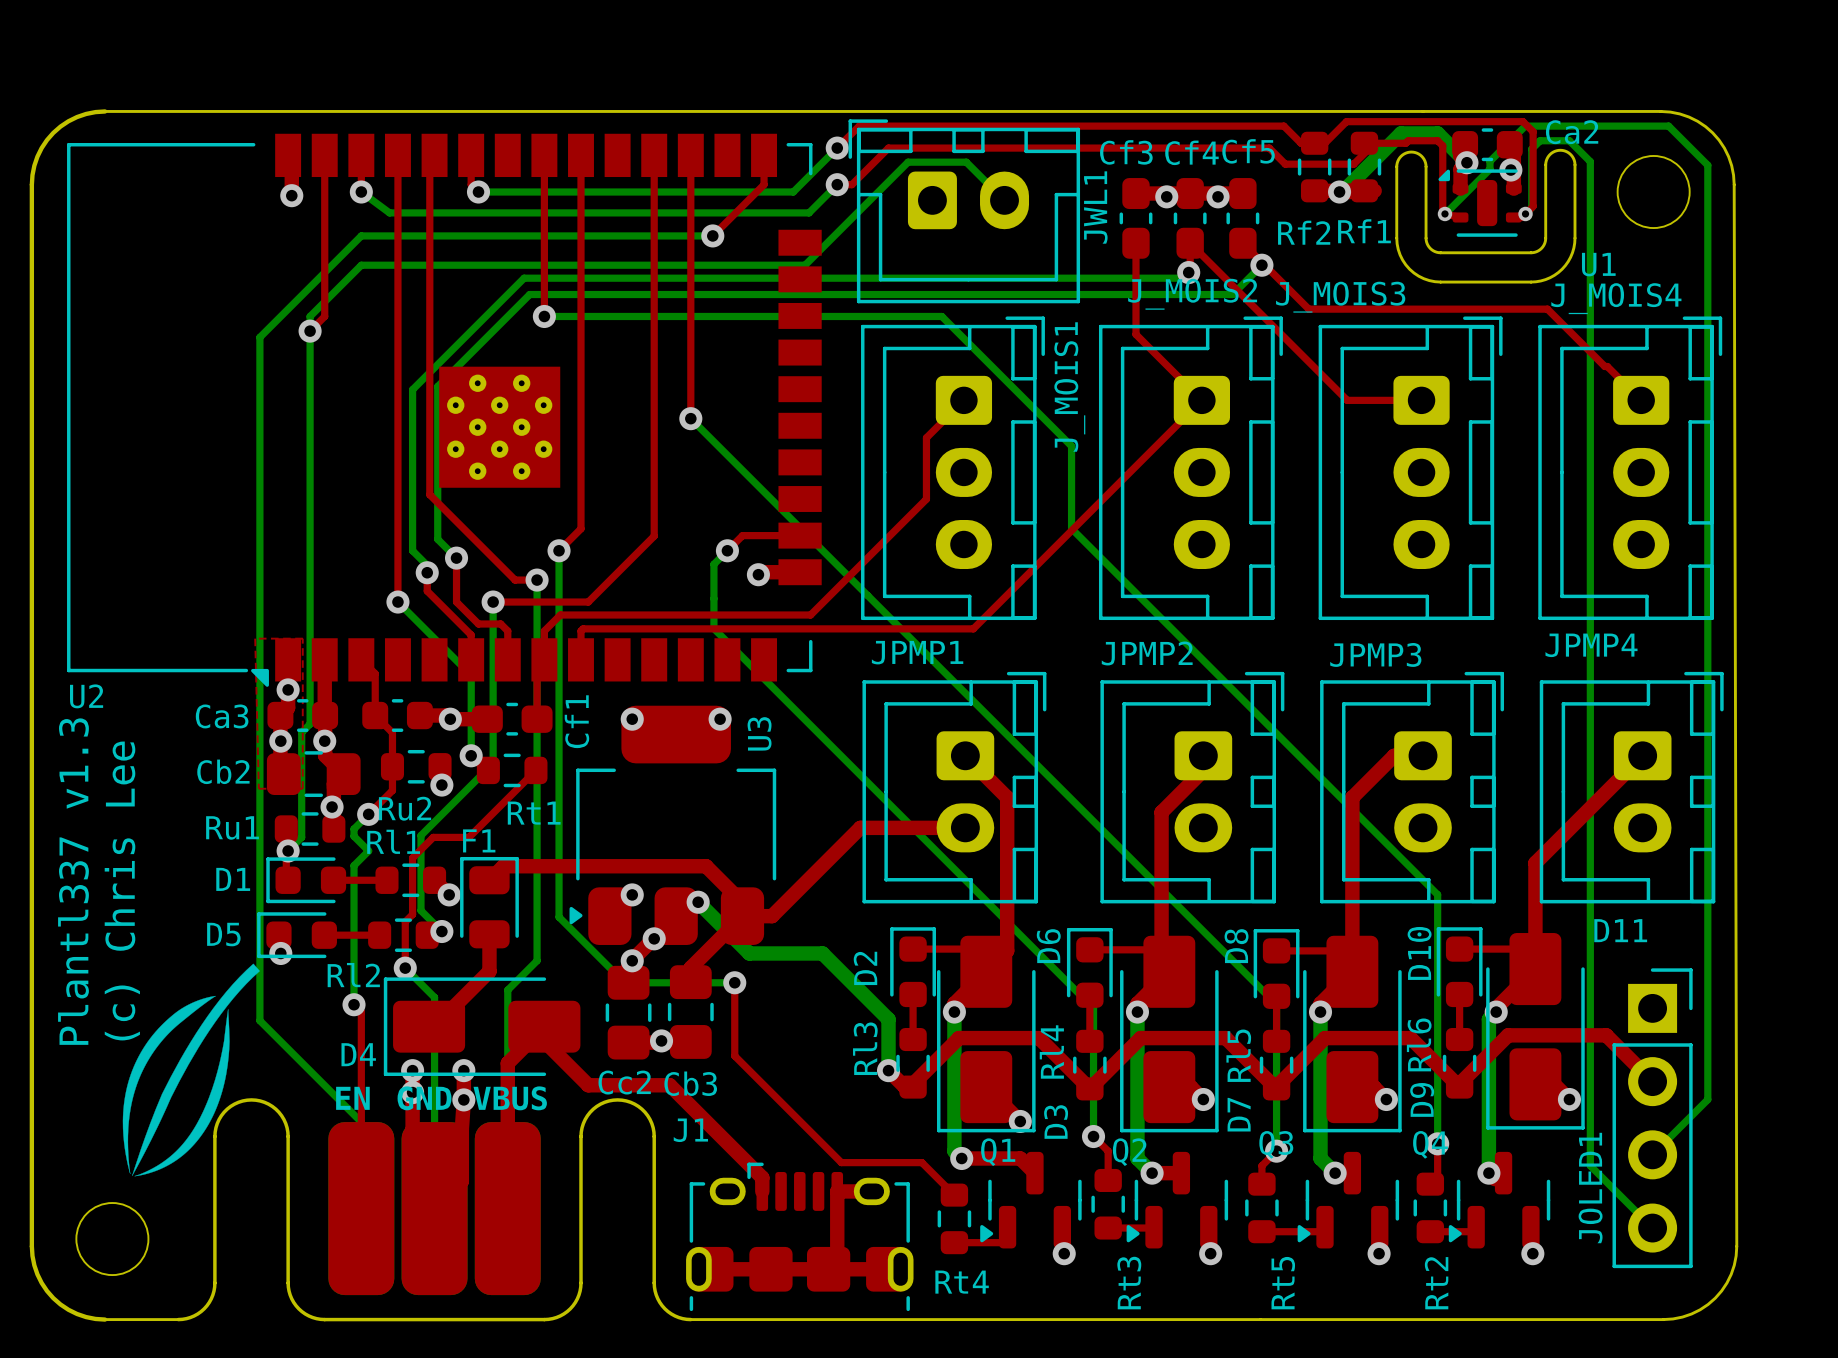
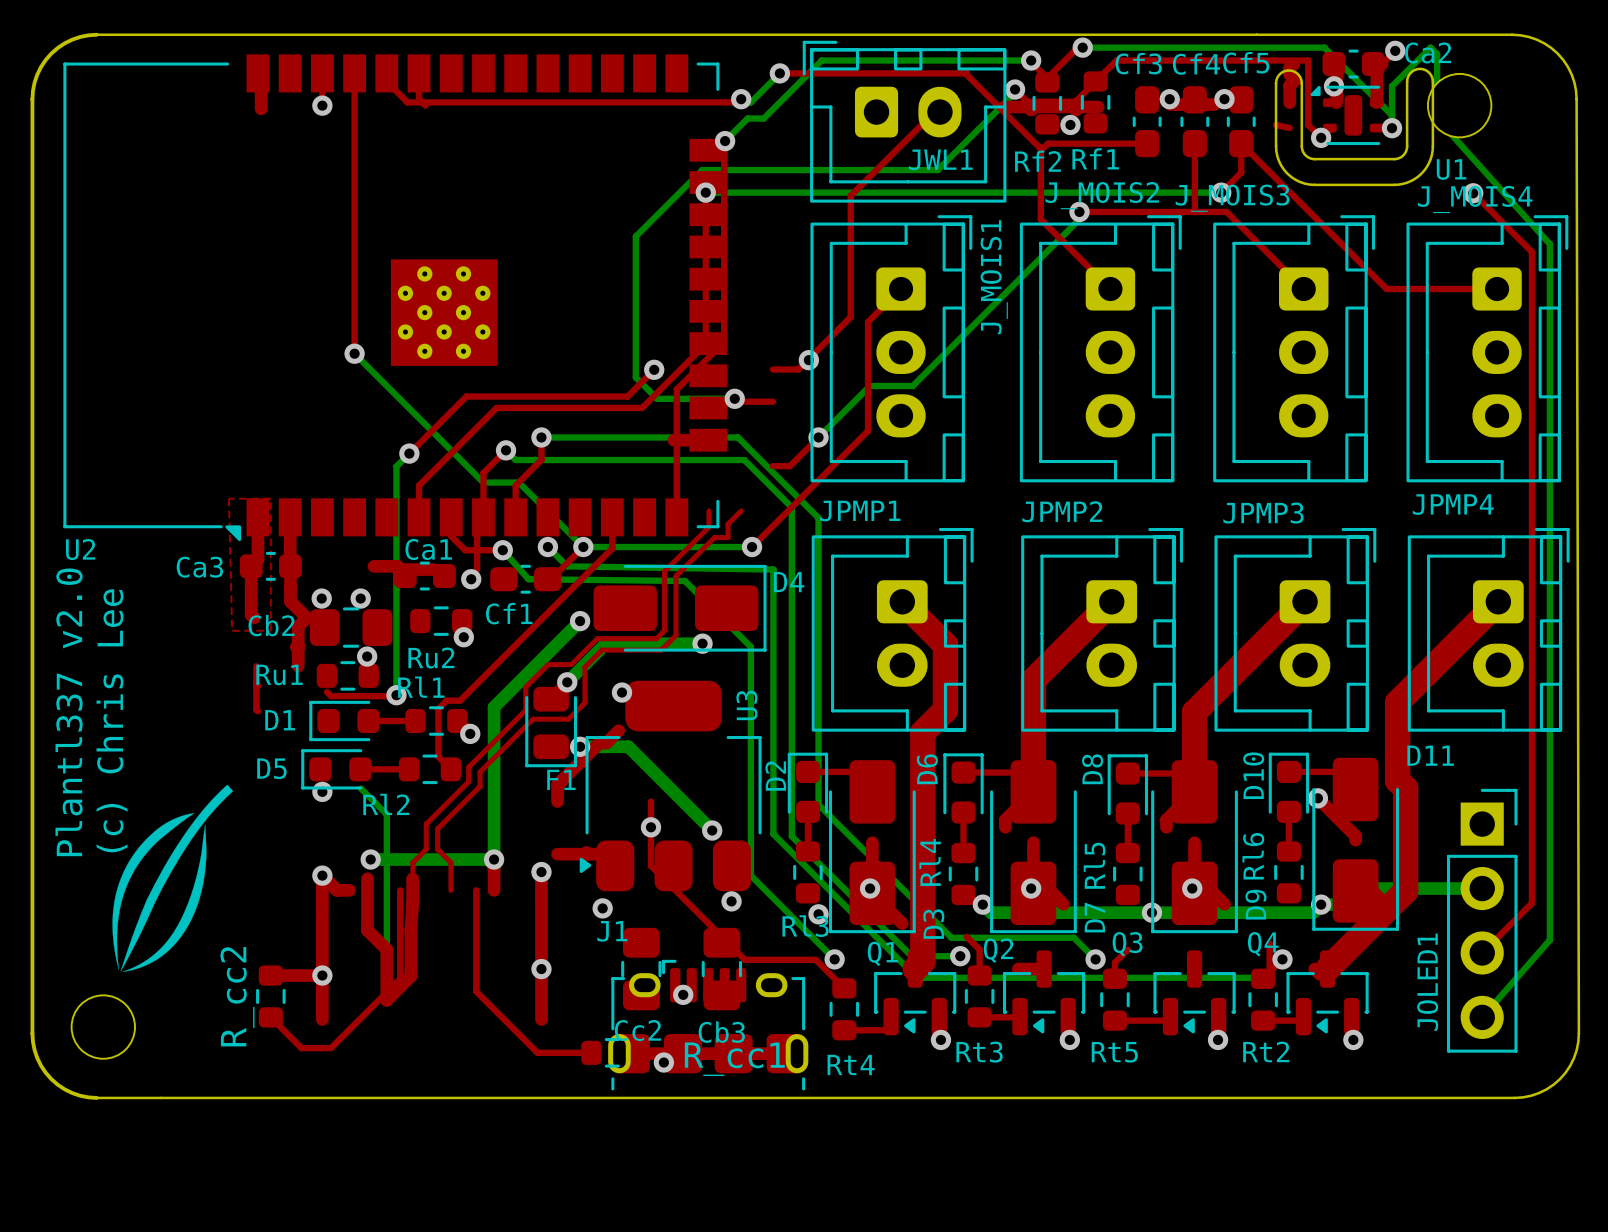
board edge: (1660, 111) (1688, 117) (1712, 132) (1728, 156) (1733, 175) (1736, 1246) (1731, 1274) (1715, 1298) (1691, 1314) (1663, 1319) -> (1466, 34) (1520, 35) (1544, 43) (1557, 53) (1567, 66) (1576, 90) (1578, 1033) (1576, 1050) (1570, 1065) (1560, 1079) (1546, 1089) (1522, 1097) (1468, 1097)
top track: (1219, 126) (859, 126) (837, 148) -> (1077, 47) (1047, 78) (1031, 60)
top track: (1225, 126) (1283, 126) (1301, 143) (1324, 143) (1346, 121) (1523, 121) (1533, 131) (1533, 206) (1522, 217) (1513, 217) -> none
bottom track: none -> (1082, 47) (1324, 47) (1392, 115)
via: none -> (1082, 47)
top track: none -> (1395, 50) (1382, 64) (1373, 64) (1376, 67) (1376, 102)
via: none -> (1395, 50)
bottom track: none -> (1031, 60) (821, 60) (763, 118) (747, 118) (725, 141)
via: none -> (1031, 60)
top track: (1408, 140) (1405, 143) (1374, 143) (1353, 164) (1285, 164) (1269, 148) (888, 148) (851, 184) (837, 184) -> (1243, 60) (1116, 60) (1075, 101) (1027, 101) (1015, 89)
top track: (1437, 140) (1442, 145) (1442, 211) -> (1269, 60) (1308, 60) (1308, 124) (1321, 137) (1329, 128) (1329, 130)
Ca2 position: (1487, 144) -> (1353, 64)
top track: none -> (386, 66) (386, 81) (407, 102) (731, 102)
bottom track: (837, 148) (793, 192) (478, 192) -> none
via: (837, 148) -> none
top track: (324, 155) (324, 316) (310, 331) -> none
top track: (434, 155) (429, 160) (429, 494) (515, 580) (537, 580) -> none
top track: (544, 155) (544, 316) -> none
top track: (581, 155) (581, 528) (559, 550) -> none
top track: (654, 155) (654, 536) (588, 602) (493, 602) -> none
top track: (690, 155) (690, 418) -> none
top track: (764, 155) (764, 184) (712, 235) -> none
top track: none -> (779, 73) (966, 73) (1040, 147) (1040, 219) (1110, 289)
bottom track: none -> (779, 73) (750, 102) (731, 102)
via: none -> (779, 73)
bottom track: (1466, 162) (1437, 133) (1401, 133) (1342, 192) (1339, 192) -> none
via: (1466, 162) -> none
Rf2 position: (1314, 167) -> (1047, 103)
Rf1 position: (1364, 167) -> (1095, 102)
via: none -> (1015, 89)
bottom track: (837, 184) (809, 212) (389, 212) (361, 192) -> none
via: none -> (1224, 99)
via: (478, 192) -> none
via position: (1339, 192) -> (1169, 99)
via: (291, 195) -> none
via: (1166, 196) -> none
via position: (1218, 196) -> (1070, 124)
top track: none -> (939, 112) (934, 112) (850, 195) (850, 317) (798, 369) (772, 369)
bottom track: (1004, 200) (966, 162) (908, 162) (805, 265) -> (1015, 89) (1015, 92) (937, 170) (712, 170)
U1 position: (1480, 203) -> (1347, 115)
JWL1 name rotation: 0° (1095, 207) -> 90° clockwise (940, 159)
JWL1 position: (964, 211) -> (904, 121)
via: (1444, 213) -> none
bottom track: (1445, 213) (1489, 169) (1489, 161) (1525, 126) (1668, 126) (1707, 165) (1707, 1099) (1652, 1154) -> none
bottom track: (1525, 213) (1531, 207) (1531, 149) (1540, 140) (1569, 140) (1590, 161) (1590, 1165) (1652, 1228) -> none
via: (1525, 213) -> none
bottom track: none -> (1392, 128) (1392, 86) (1430, 47) (1437, 54) (1437, 118) (1549, 244) (1549, 940) (1482, 1017)
via: none -> (1392, 128)
Cf3 position: (1135, 218) -> (1147, 121)
Cf4 position: (1190, 218) -> (1194, 121)
Cf5 position: (1242, 218) -> (1241, 121)
via: none -> (1321, 137)
top track: none -> (725, 141) (724, 342) (676, 389) (676, 510)
via: none -> (725, 141)
bottom track: (712, 235) (361, 235) (259, 337) (259, 1020) (361, 1122) (361, 1208) -> none
via: (712, 235) -> none
top track: none -> (1147, 143) (1047, 143) (1040, 150)
top track: none -> (1194, 143) (1195, 211)
top track: (1135, 243) (1135, 334) (1201, 400) (973, 628) (583, 628) (581, 631) -> (541, 437) (541, 459) (515, 485) (515, 491)
top track: (1242, 243) (1261, 262) (1261, 265) (1264, 265) (1308, 309) (1547, 309) (1641, 400) -> none
board edge: (1488, 252) (1438, 252) (1430, 248) (1426, 238) (1425, 162) (1421, 156) (1415, 152) (1407, 152) (1401, 156) (1396, 166) (1396, 238) (1398, 249) (1405, 264) (1418, 276) (1429, 280) (1488, 282) -> (1314, 159) (1306, 156) (1301, 147) (1300, 78) (1294, 71) (1284, 71) (1279, 74) (1276, 81) (1277, 156) (1284, 169) (1291, 176) (1299, 181) (1314, 184)
board edge: (1531, 252) (1540, 249) (1545, 239) (1546, 159) (1555, 151) (1565, 151) (1571, 155) (1574, 163) (1573, 247) (1568, 261) (1558, 272) (1545, 279) (1531, 282) -> (1351, 159) (1395, 159) (1403, 155) (1407, 146) (1407, 78) (1410, 72) (1416, 69) (1423, 69) (1429, 72) (1432, 81) (1432, 146) (1426, 166) (1414, 178) (1402, 183) (1351, 184)
bottom track: (793, 265) (361, 265) (310, 316) (310, 724) (301, 732) (301, 837) (288, 850) -> (702, 170) (635, 236) (635, 377) (657, 398) (734, 398)
bottom track: (1261, 265) (1232, 294) (529, 294) (437, 386) (437, 539) (456, 558) -> none
via: (1261, 265) -> none
top track: (1188, 272) (1190, 243) (1347, 400) (1421, 400) -> none
bottom track: (1188, 272) (1183, 278) (524, 278) (412, 389) (412, 550) (427, 565) (427, 572) -> none
via: (1188, 272) -> none
bottom track: none -> (705, 192) (1221, 192)
via: none -> (705, 192)
top track: none -> (1221, 192) (1241, 172) (1241, 143) (1386, 289) (1497, 289)
via: none -> (1221, 192)
top track: none -> (1473, 193) (1531, 252) (1531, 903) (1482, 952)
via: none -> (1473, 193)
top track: none -> (1079, 211) (1226, 211) (1303, 289)
bottom track: none -> (1079, 211) (1079, 219) (912, 386) (869, 386) (818, 437)
via: none -> (1079, 211)
bottom track: (544, 316) (941, 316) (1071, 446) (1071, 528) (1437, 894) (1437, 1143) -> none
via: (544, 316) -> none
via: (310, 331) -> none
top track: (963, 400) (926, 437) (926, 499) (810, 615) (560, 615) (544, 631) -> (506, 450) (483, 472) (483, 491)
top track: none -> (901, 289) (868, 321) (868, 431) (752, 547)
bottom track: (690, 418) (1276, 1004) (1276, 1151) -> none
via: (690, 418) -> none
J_MOIS1 position: (952, 468) -> (891, 348)
J_MOIS2 position: (1190, 468) -> (1100, 348)
J_MOIS3 position: (1410, 468) -> (1294, 348)
J_MOIS4 position: (1630, 468) -> (1487, 348)
top track: (397, 473) (397, 602) -> none
bottom track: none -> (354, 353) (483, 482) (518, 482) (583, 547) (752, 547)
via: none -> (354, 353)
via: none -> (808, 360)
top track: none -> (654, 369) (627, 396) (466, 396) (409, 453)
via: none -> (654, 369)
top track: none -> (734, 398) (737, 401) (772, 401)
via: none -> (734, 398)
top track: (800, 535) (742, 535) (727, 550) -> none
bottom track: (559, 550) (559, 917) (624, 982) (734, 982) -> none
via: (559, 550) -> none
bottom track: (727, 550) (713, 564) (713, 628) (1093, 1008) (1093, 1136) -> none
via: (727, 550) -> none
top track: (456, 558) (456, 602) (478, 624) (500, 624) (507, 631) (507, 652) -> none
via: (456, 558) -> none
bottom track: none -> (541, 437) (738, 437) (818, 517) (818, 804) (951, 937) (1073, 937) (1095, 959)
via: none -> (541, 437)
top track: none -> (818, 437) (789, 466) (772, 466)
via: none -> (818, 437)
top track: (427, 572) (427, 591) (471, 635) -> (705, 189) (705, 344) (642, 407) (496, 407) (419, 485) (419, 495)
via: (427, 572) -> none
via: (758, 574) -> none
bottom track: (537, 580) (537, 960) (507, 990) (507, 1208) -> none
via: (537, 580) -> none
bottom track: none -> (506, 450) (515, 460) (744, 460) (791, 507) (791, 836) (911, 956) (960, 956)
via: none -> (506, 450)
bottom track: none -> (409, 453) (396, 466) (396, 695)
via: none -> (409, 453)
bottom track: (397, 602) (471, 675) (471, 755) -> none
via: (397, 602) -> none
bottom track: (493, 602) (493, 763) (420, 835) (420, 910) (441, 931) -> none
via: (493, 602) -> none
top track: none -> (612, 510) (612, 548) (460, 700) (446, 700) (438, 708) (438, 756) (450, 769)
top track: none -> (708, 510) (708, 526) (664, 571) (664, 630) (656, 638) (597, 638) (571, 664) (548, 664) (525, 687) (525, 710) (468, 767) (468, 781) (426, 824) (426, 849) (412, 862) (412, 890)
top track: none -> (741, 510) (728, 524) (728, 537) (714, 537) (675, 576) (675, 635) (661, 650) (602, 650) (584, 667) (584, 702) (568, 719) (532, 719) (480, 772) (480, 786) (437, 828) (437, 849) (450, 862) (450, 890)
top track: (361, 659) (375, 673) (375, 715) (392, 732) (392, 790) (368, 814) -> none
top track: none -> (451, 517) (451, 536) (465, 550) (502, 550)
via: (288, 689) -> none
bottom track: none -> (547, 547) (567, 566) (773, 569) (773, 834) (917, 977) (1264, 977) (1282, 959)
via: none -> (547, 547)
top track: none -> (583, 547) (551, 579) (547, 579)
via: none -> (583, 547)
via: none -> (752, 547)
bottom track: none -> (502, 550) (528, 579) (684, 580) (750, 646) (750, 875) (834, 959)
via: none -> (502, 550)
part: (397, 715) -> none
via: (450, 719) -> none
Cf1 position: (512, 719) -> (525, 579)
via: (632, 719) -> none
via: (720, 719) -> none
Cf1 name rotation: 0° (576, 721) -> 90° clockwise (509, 613)
Ca1: none -> (424, 576)
via: none -> (471, 579)
via: (280, 741) -> none
via: (324, 741) -> none
via: none -> (321, 598)
via: none -> (360, 598)
via: (471, 755) -> none
top track: (965, 755) (1007, 797) (1007, 950) (954, 1003) (954, 1012) -> none
top track: (1203, 755) (1203, 770) (1161, 812) (1161, 964) -> none
top track: none -> (1111, 601) (1033, 680) (1033, 783)
top track: (1423, 755) (1394, 755) (1352, 797) (1352, 881) -> (1305, 601) (1194, 712)
top track: (1642, 755) (1535, 863) (1535, 969) (1492, 1012) (1496, 1012) (1496, 1008) -> none
top track: none -> (1498, 601) (1397, 702) (1397, 780) (1405, 788) (1405, 891) (1327, 969)
Ru2 position: (416, 766) -> (441, 621)
Rt1: (512, 770) -> none
top track: (535, 770) (468, 837) (433, 837) (412, 858) (412, 914) (405, 921) (405, 968) -> none
Cb2 position: (313, 774) -> (351, 627)
bottom track: none -> (580, 621) (494, 707) (494, 870)
via: none -> (580, 621)
via: (441, 785) -> none
JPMP1 position: (954, 787) -> (892, 629)
JPMP2 position: (1192, 787) -> (1102, 629)
JPMP3 position: (1412, 787) -> (1295, 629)
JPMP4 position: (1631, 787) -> (1488, 629)
via: none -> (463, 637)
bottom track: none -> (702, 643) (605, 643) (567, 682)
via: none -> (702, 643)
via: (332, 807) -> none
bottom track: (368, 814) (354, 829) (354, 836) (368, 850) (354, 865) (354, 1004) -> none
via: (368, 814) -> none
via: none -> (367, 656)
U3 position: (672, 825) -> (670, 785)
top track: (965, 827) (860, 827) (772, 916) (742, 916) -> none
Ru1 position: (310, 829) -> (347, 675)
via: none -> (567, 682)
via: (288, 850) -> none
top track: none -> (326, 692) (331, 696) (396, 695)
via: none -> (622, 692)
D1 position: (306, 880) -> (344, 721)
top track: (333, 880) (386, 880) -> (368, 721) (415, 721)
Rl1 position: (410, 880) -> (436, 721)
top track: (489, 880) (503, 866) (706, 866) (742, 902) (742, 916) -> none
text: Plantl337 v1.3 (73, 881) -> Plantl337 v2.0 (69, 712)
top track width: thin (1352, 881) (1352, 961) -> thick (1194, 712) (1194, 783)
via position: (449, 894) -> (396, 695)
via: (632, 894) -> none
F1 rotation: 0° (489, 902) -> 180° (551, 727)
F1 position: (489, 902) -> (551, 727)
bottom track: (698, 902) (749, 953) (822, 953) (888, 1019) (888, 1070) -> none
via: (698, 902) -> none
via: none -> (470, 733)
top track: (742, 916) (690, 967) (690, 982) -> none
bottom track: none -> (580, 746) (628, 746) (712, 830)
via: (441, 931) -> none
top track: (489, 934) (489, 971) (434, 1026) (429, 1026) -> none
D5 position: (297, 935) -> (336, 769)
top track: (324, 935) (379, 935) -> (360, 769) (409, 769)
Rl2 position: (403, 935) -> (429, 769)
via position: (654, 938) -> (580, 746)
via: (280, 953) -> none
via: (632, 960) -> none
via: (405, 968) -> none
D2 name position: D2 (865, 968) -> D2 (775, 776)
via: none -> (322, 791)
top track: none -> (1317, 798) (1355, 836) (1355, 840)
via position: (734, 982) -> (651, 827)
top track: (354, 1004) (361, 1012) (361, 1066) -> (349, 890) (337, 890) (322, 875)
via: (354, 1004) -> none
Cc2 position: (628, 1012) -> (641, 969)
Cb3 position: (690, 1012) -> (721, 969)
bottom track: (954, 1012) (954, 1151) (961, 1158) -> none
via: (954, 1012) -> none
bottom track: (1137, 1012) (1137, 1158) (1152, 1173) -> none
via: (1137, 1012) -> none
bottom track: (1320, 1012) (1320, 1158) (1335, 1173) -> none
via: (1320, 1012) -> none
bottom track: (1496, 1012) (1488, 1019) (1488, 1173) -> none
via position: (1496, 1012) -> (1317, 798)
via: none -> (712, 830)
D4 rotation: 0° (482, 1026) -> 180° (680, 608)
D4 position: (482, 1026) -> (680, 608)
top track: none -> (872, 842) (872, 886) (870, 888)
top track: none -> (1033, 842) (1033, 886) (1031, 888)
top track: none -> (1194, 842) (1194, 886) (1192, 888)
via: (661, 1040) -> none
bottom track: none -> (370, 859) (494, 860)
via: none -> (494, 859)
Rl3 name rotation: 0° (865, 1048) -> 90° clockwise (805, 926)
Rl3 name position: Rl3 (865, 1048) -> Rl3 (805, 926)
top track: none -> (494, 860) (494, 890)
top track: none -> (541, 872) (541, 1019)
via: none -> (541, 872)
top track width: thin (361, 1066) (361, 1109) -> thick (322, 875) (322, 913)
via: none -> (322, 875)
via position: (412, 1070) -> (370, 859)
via: (463, 1070) -> none
top track: (888, 1070) (904, 1087) (913, 1087) (913, 1084) (959, 1038) (1039, 1038) (1089, 1088) (1140, 1038) (1225, 1038) (1276, 1088) (1276, 1086) (1325, 1038) (1410, 1038) (1459, 1087) (1459, 1083) (1508, 1035) (1606, 1035) (1652, 1081) -> none
via: (888, 1070) -> none
via: none -> (870, 888)
via: none -> (1031, 888)
via: none -> (1192, 888)
bottom track: none -> (1482, 888) (1353, 888) (1337, 904) (1321, 904) (1313, 912) (990, 912) (982, 904)
top track: none -> (400, 890) (400, 978) (331, 1048) (301, 1048) (270, 1017)
top track: none -> (476, 890) (476, 991) (537, 1052) (591, 1052)
via: (412, 1092) -> none
via: none -> (731, 901)
text: EN (352, 1098) -> none
text: GND (424, 1098) -> none
text: VBUS (510, 1098) -> none
via: (463, 1099) -> none
via: none -> (982, 904)
via: (1203, 1099) -> none
via: (1386, 1099) -> none
via: none -> (1321, 904)
via: (1569, 1099) -> none
via: none -> (602, 908)
via: none -> (1151, 912)
via: none -> (818, 914)
top track: none -> (322, 917) (322, 1019)
JOLED1 position: (1652, 1118) -> (1482, 920)
via: (1020, 1121) -> none
via position: (1093, 1136) -> (960, 956)
via position: (1437, 1143) -> (1282, 959)
Q1 footprint: [980, 1151, 1082, 1249] -> [874, 950, 957, 1036]
Q2 footprint: [1126, 1151, 1229, 1249] -> [1002, 950, 1086, 1036]
via: (1276, 1151) -> none
Q3 footprint: [1297, 1151, 1400, 1249] -> [1153, 950, 1236, 1036]
Q4 footprint: [1448, 1151, 1551, 1249] -> [1286, 950, 1369, 1036]
top track: (961, 1158) (1020, 1158) (1034, 1173) -> (902, 601) (945, 644) (945, 709) (922, 732) (922, 961) (915, 969)
via position: (961, 1158) -> (834, 959)
via: none -> (1095, 959)
via: none -> (541, 969)
via: (1152, 1173) -> none
via: (1335, 1173) -> none
via: (1488, 1173) -> none
top track: none -> (270, 975) (322, 975)
via: none -> (322, 975)
top track: (762, 1191) (762, 1177) (669, 1085) (588, 1085) (544, 1041) (544, 1026) (507, 1063) (507, 1208) -> none
top track: (871, 1191) (837, 1191) (837, 1260) (828, 1269) -> none
via: none -> (683, 994)
R_cc2: none -> (270, 996)
part: (434, 1209) -> none
R_cc1: none -> (612, 1052)
via: none -> (663, 1062)
Rt3 name rotation: 0° (1129, 1283) -> 90° clockwise (979, 1052)
Rt5 name rotation: 0° (1283, 1283) -> 90° clockwise (1114, 1052)
Rt2 name rotation: 0° (1436, 1283) -> 90° clockwise (1266, 1051)
board edge: none -> (161, 1097) (612, 1097)

